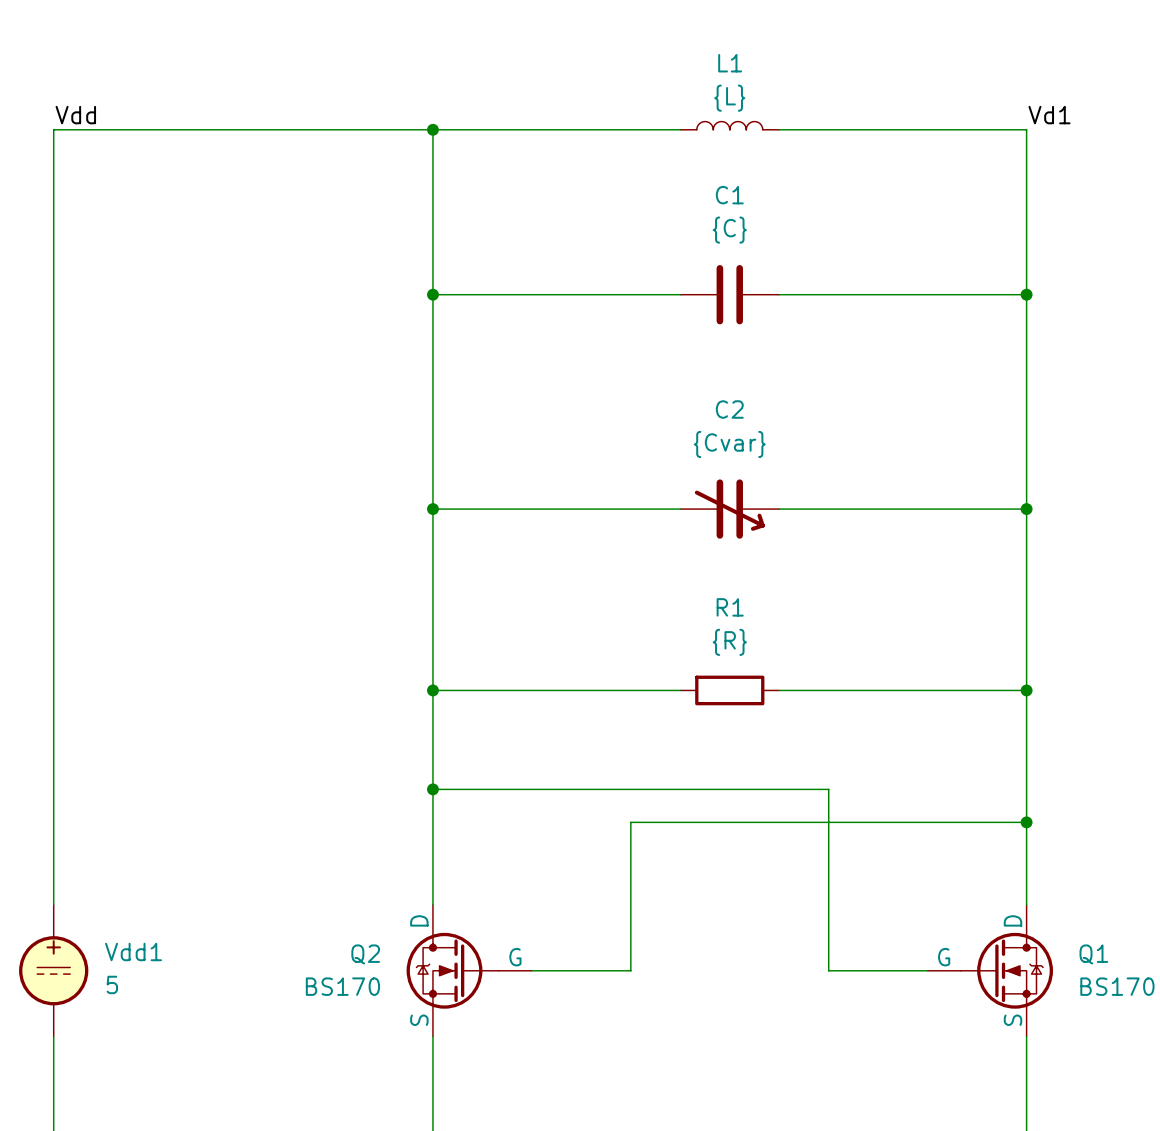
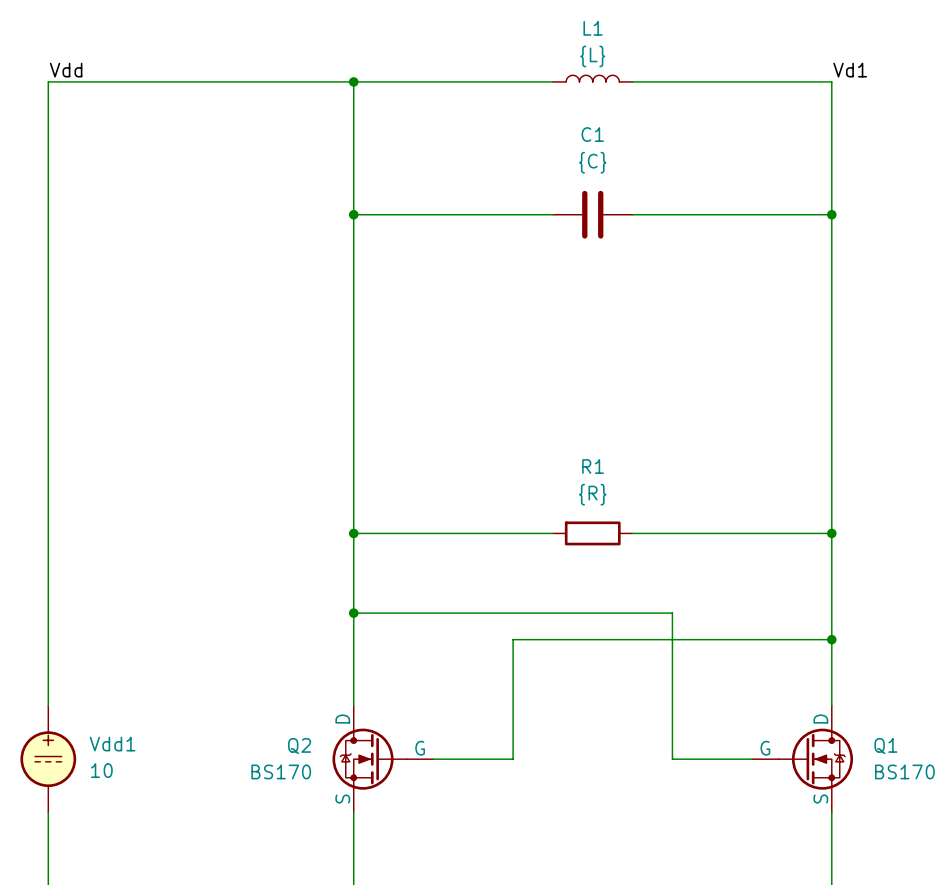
wire: (432, 509) (680, 509) -> none
junction: (432, 509) -> none
C2: {Cvar} (729, 509) -> none
wire: (779, 509) (1026, 509) -> none
junction: (1026, 509) -> none
Vdd1 value: 5 (112, 984) -> 10 (101, 770)

